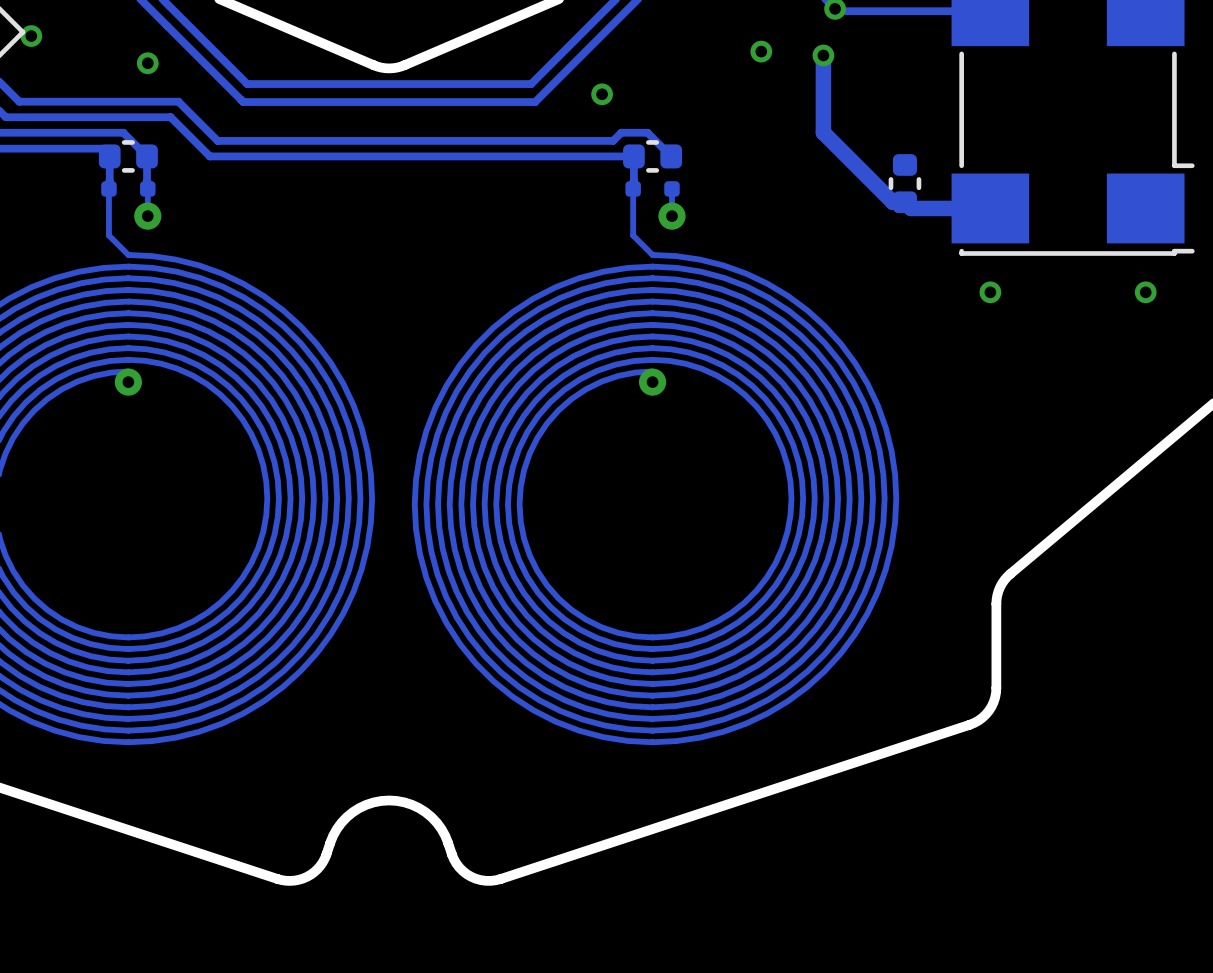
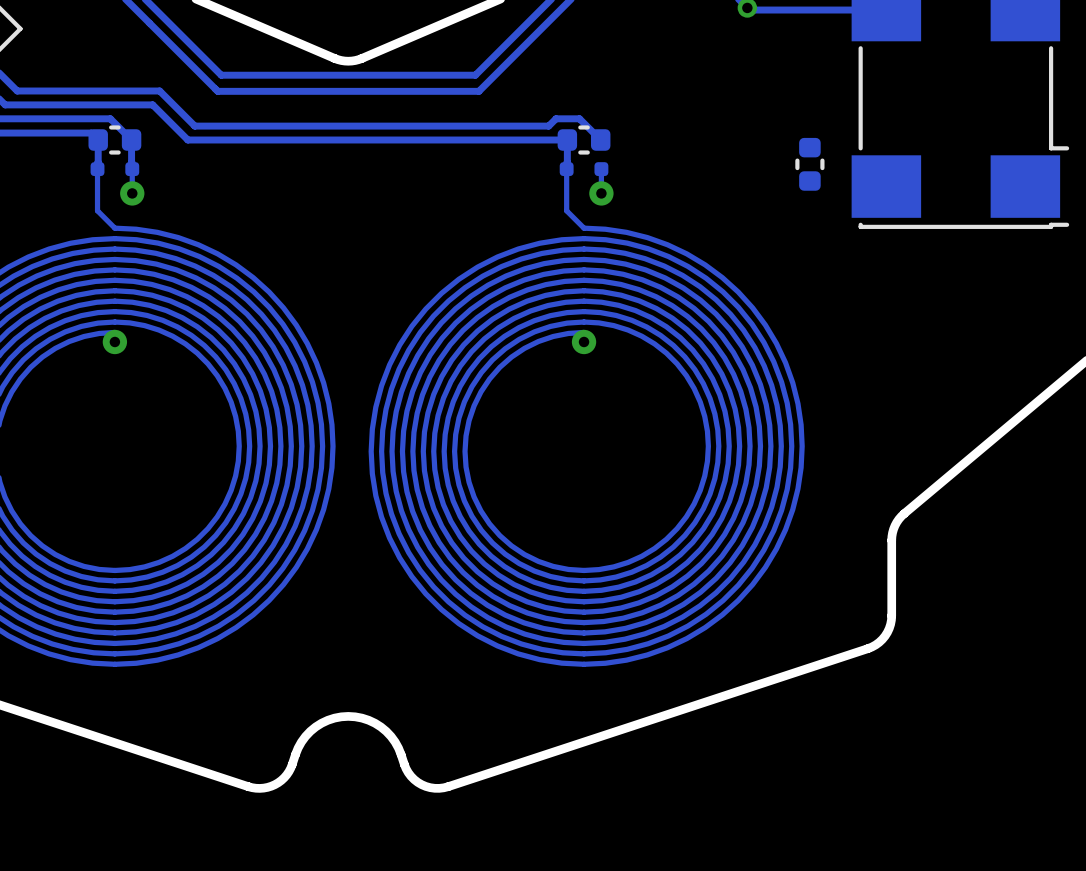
via: (31, 36) -> none
via: (761, 51) -> none
track: (823, 55) (823, 132) (892, 202) (904, 202) (911, 208) (990, 208) -> none
via: (823, 55) -> none
via: (147, 63) -> none
via: (602, 94) -> none
via: (990, 292) -> none
via: (1145, 292) -> none

